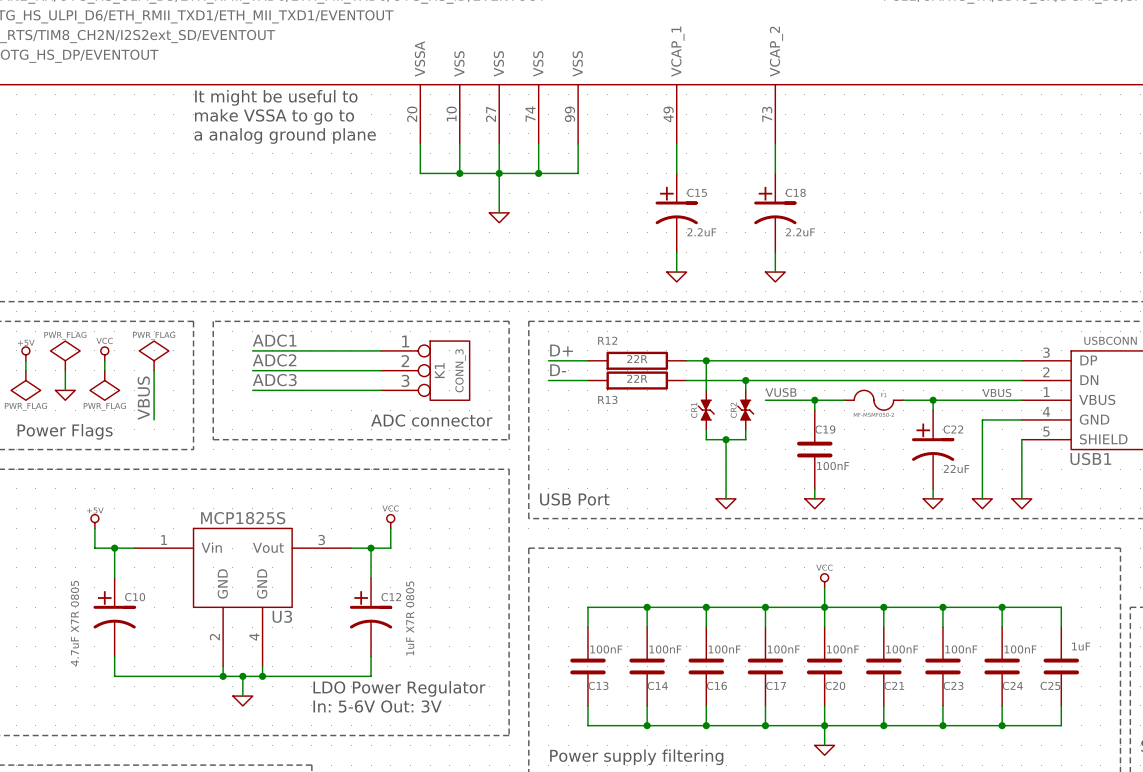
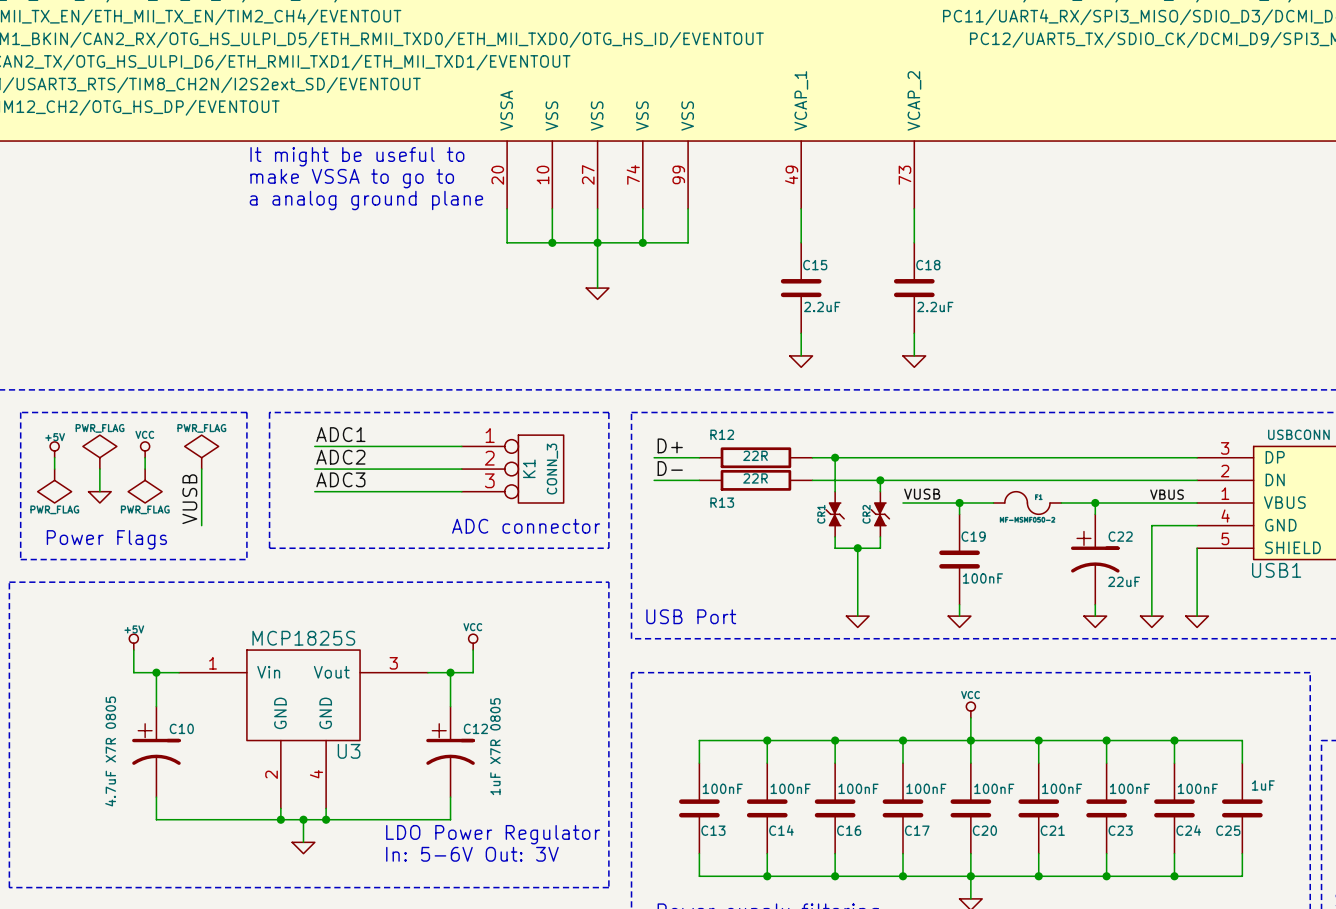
C15 symbol: [655, 173, 698, 253] -> [780, 242, 822, 334]
C18 symbol: [754, 173, 797, 253] -> [893, 242, 935, 334]
label: VBUS (143, 398) -> VUSB (189, 499)

